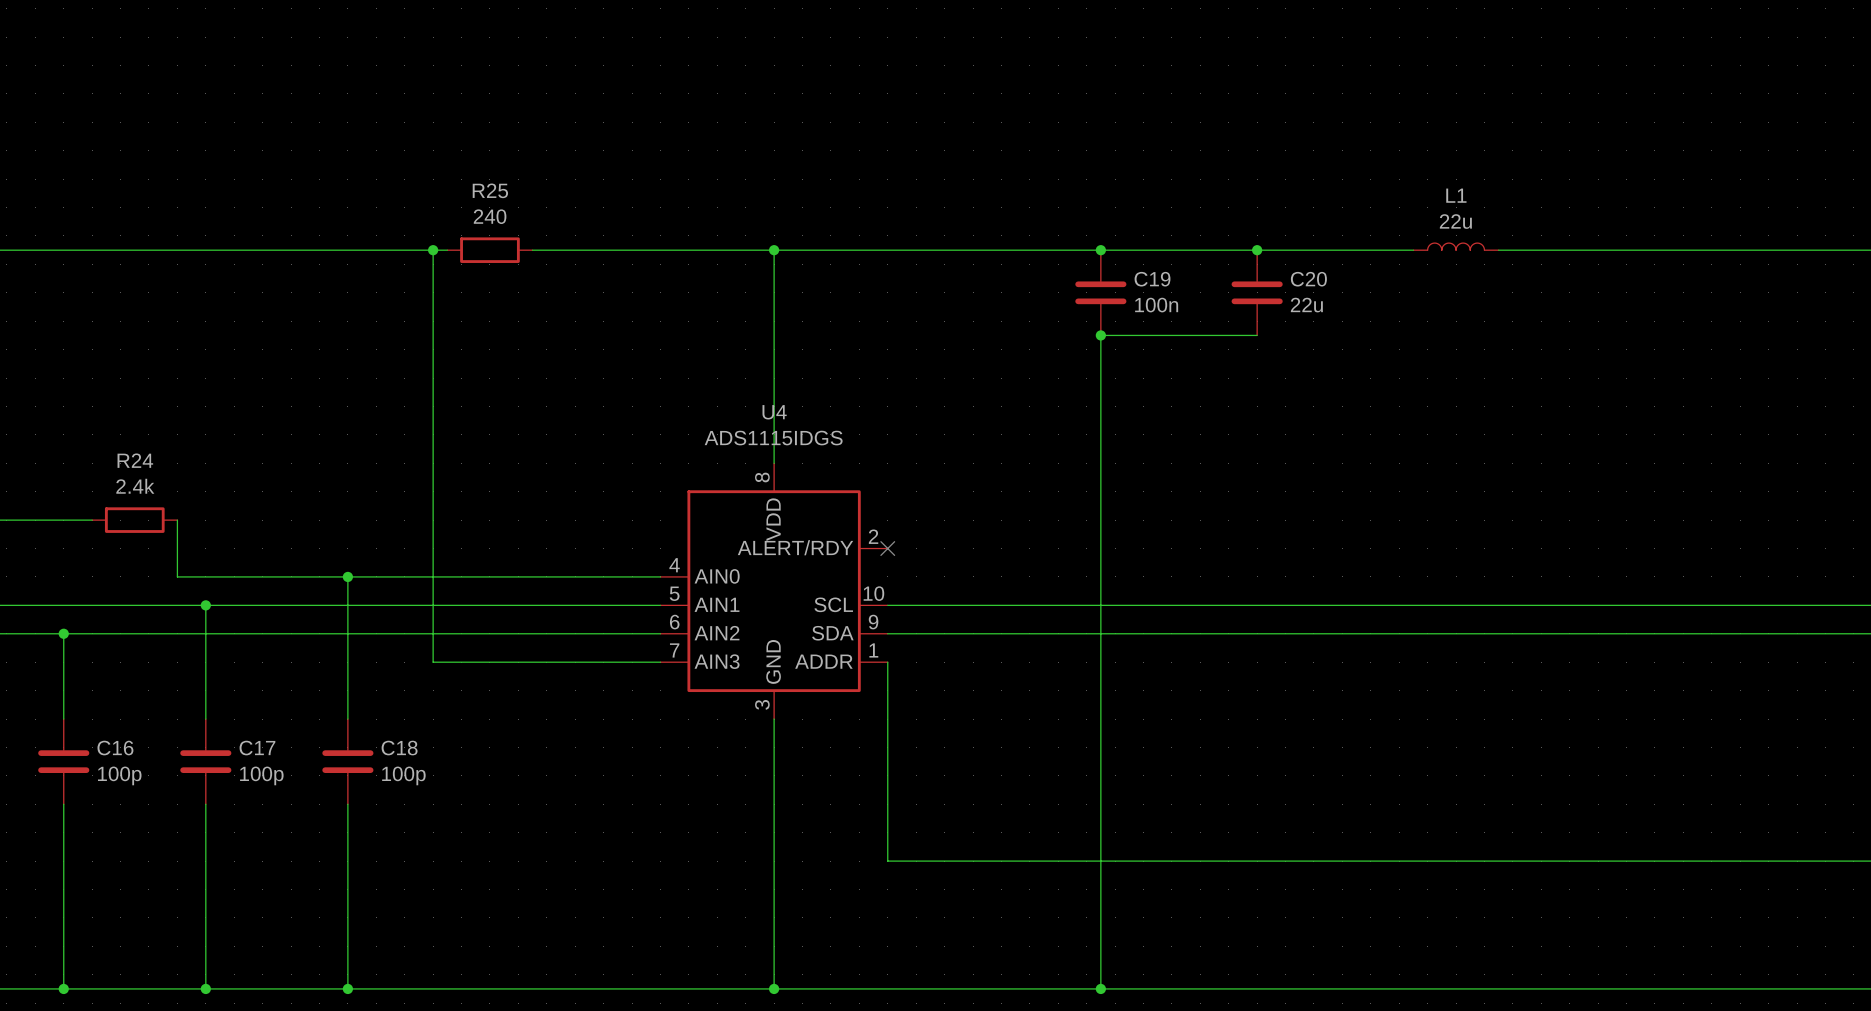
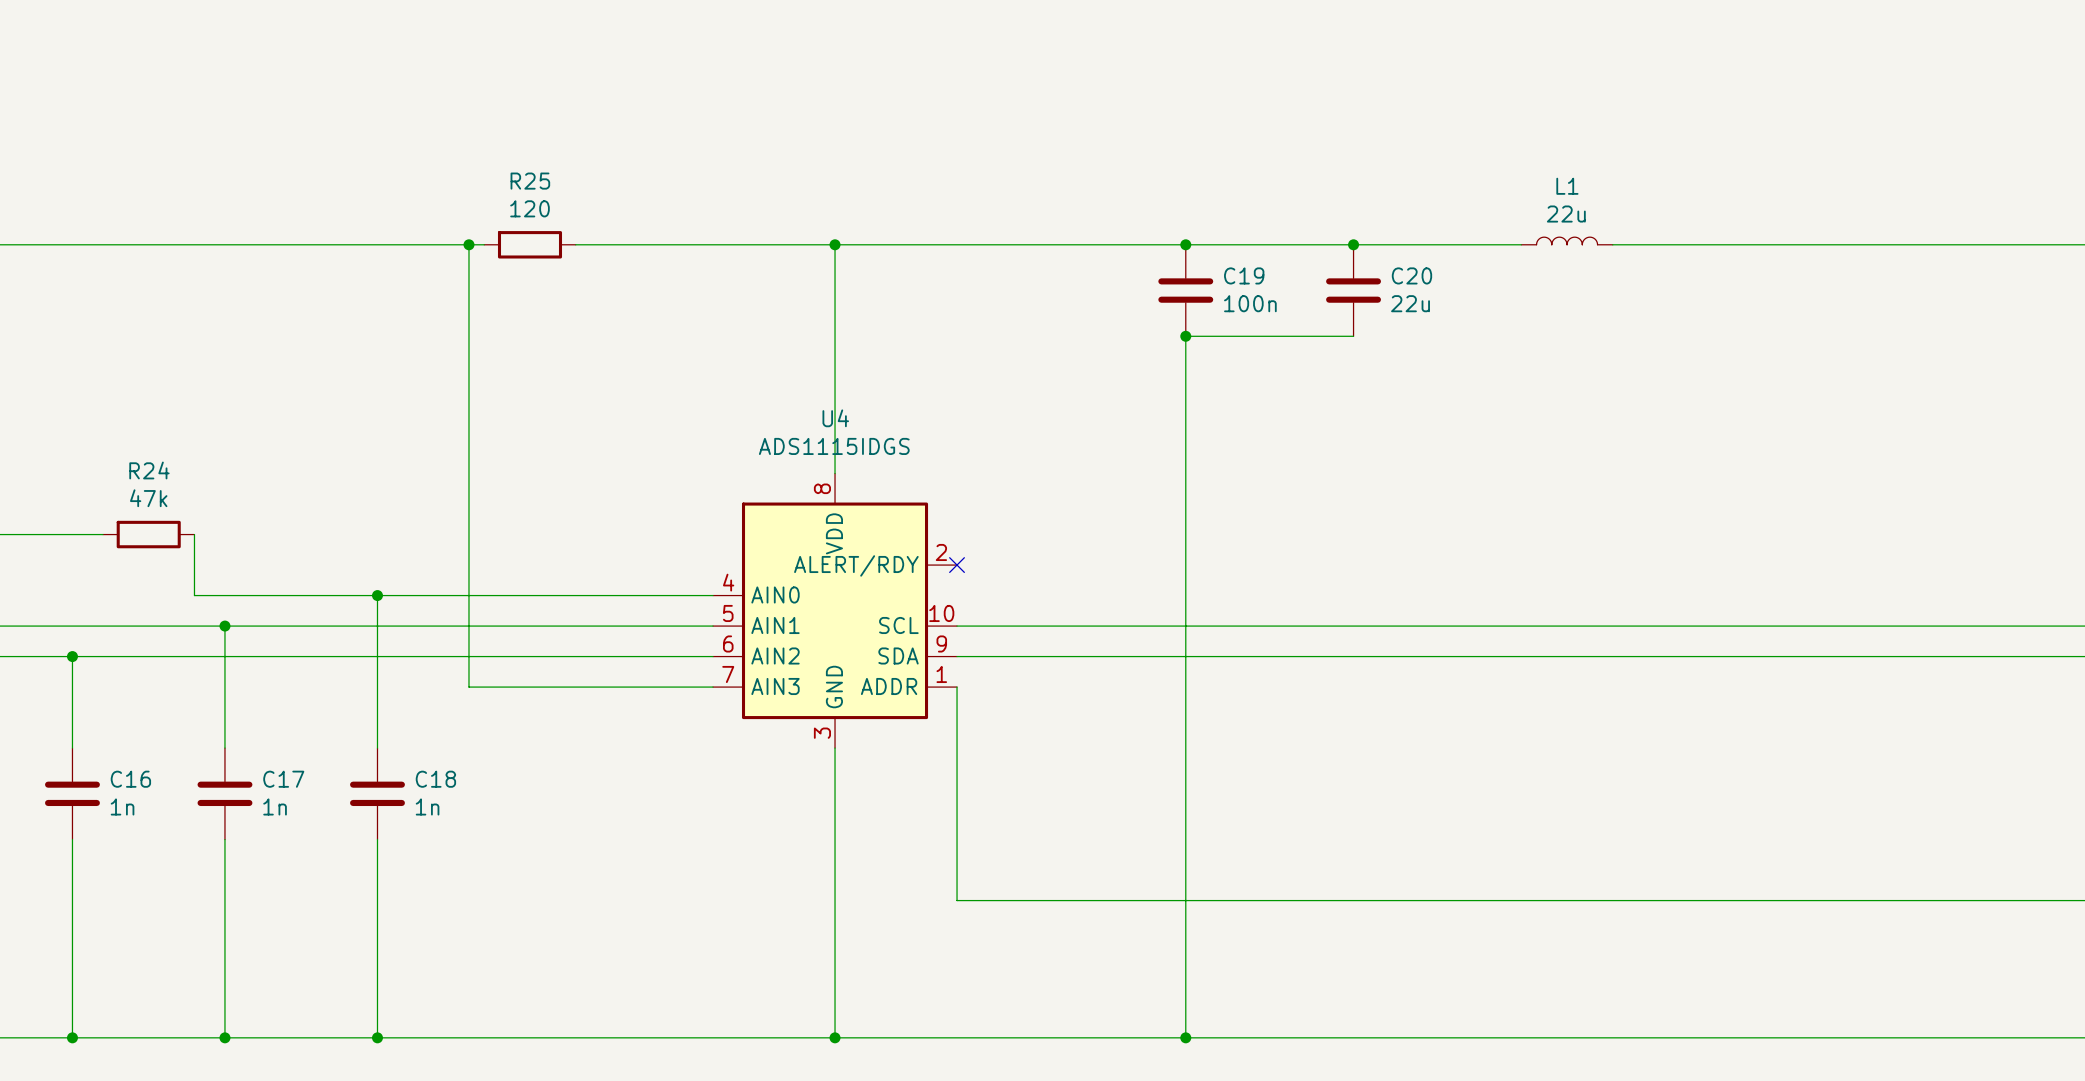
R25 value: 240 (490, 216) -> 120 (529, 208)
R24 value: 2.4k (135, 486) -> 47k (148, 498)
C16 value: 100p (119, 775) -> 1n (122, 806)
C17 value: 100p (261, 775) -> 1n (275, 806)
C18 value: 100p (403, 775) -> 1n (427, 806)

